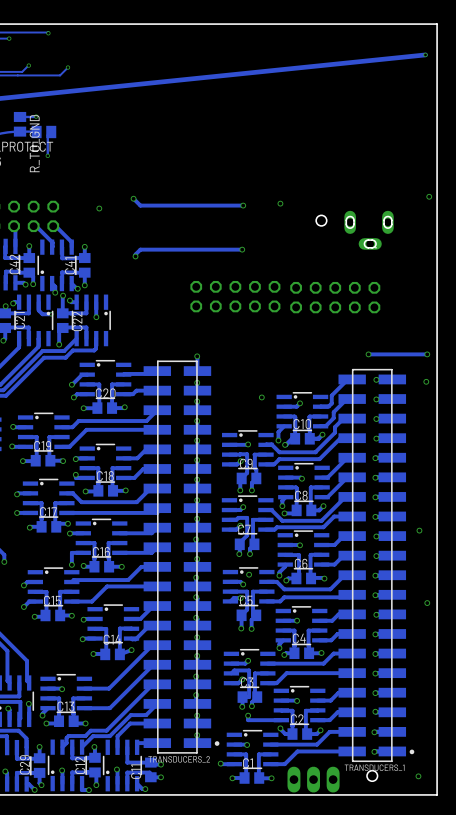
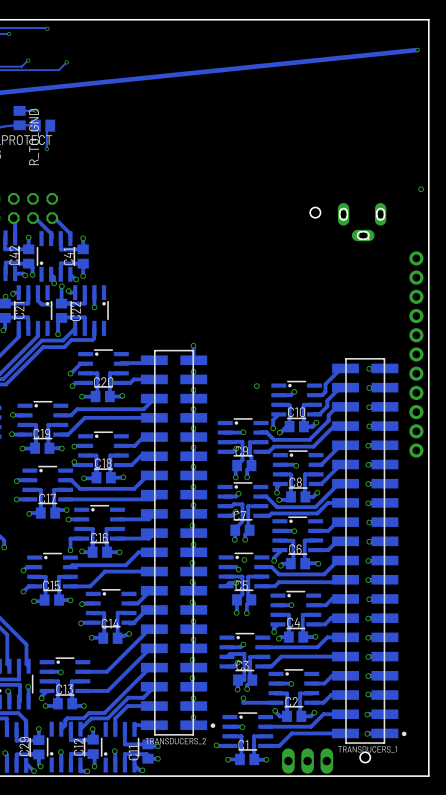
track: (133, 198) (140, 205) (243, 205) -> none
via: (133, 198) -> none
via: (280, 203) -> none
via: (243, 205) -> none
via: (99, 208) -> none
track: (242, 249) (140, 249) (135, 256) -> none
via: (242, 249) -> none
via: (135, 256) -> none
part: (235, 296) -> none
part: (335, 297) -> none
via: (368, 354) -> none
track: (427, 354) (368, 354) -> none
via: (427, 354) -> none
part: none -> (416, 354)
via: (426, 381) -> none
via: (419, 530) -> none
via: (427, 603) -> none
via: (418, 776) -> none

